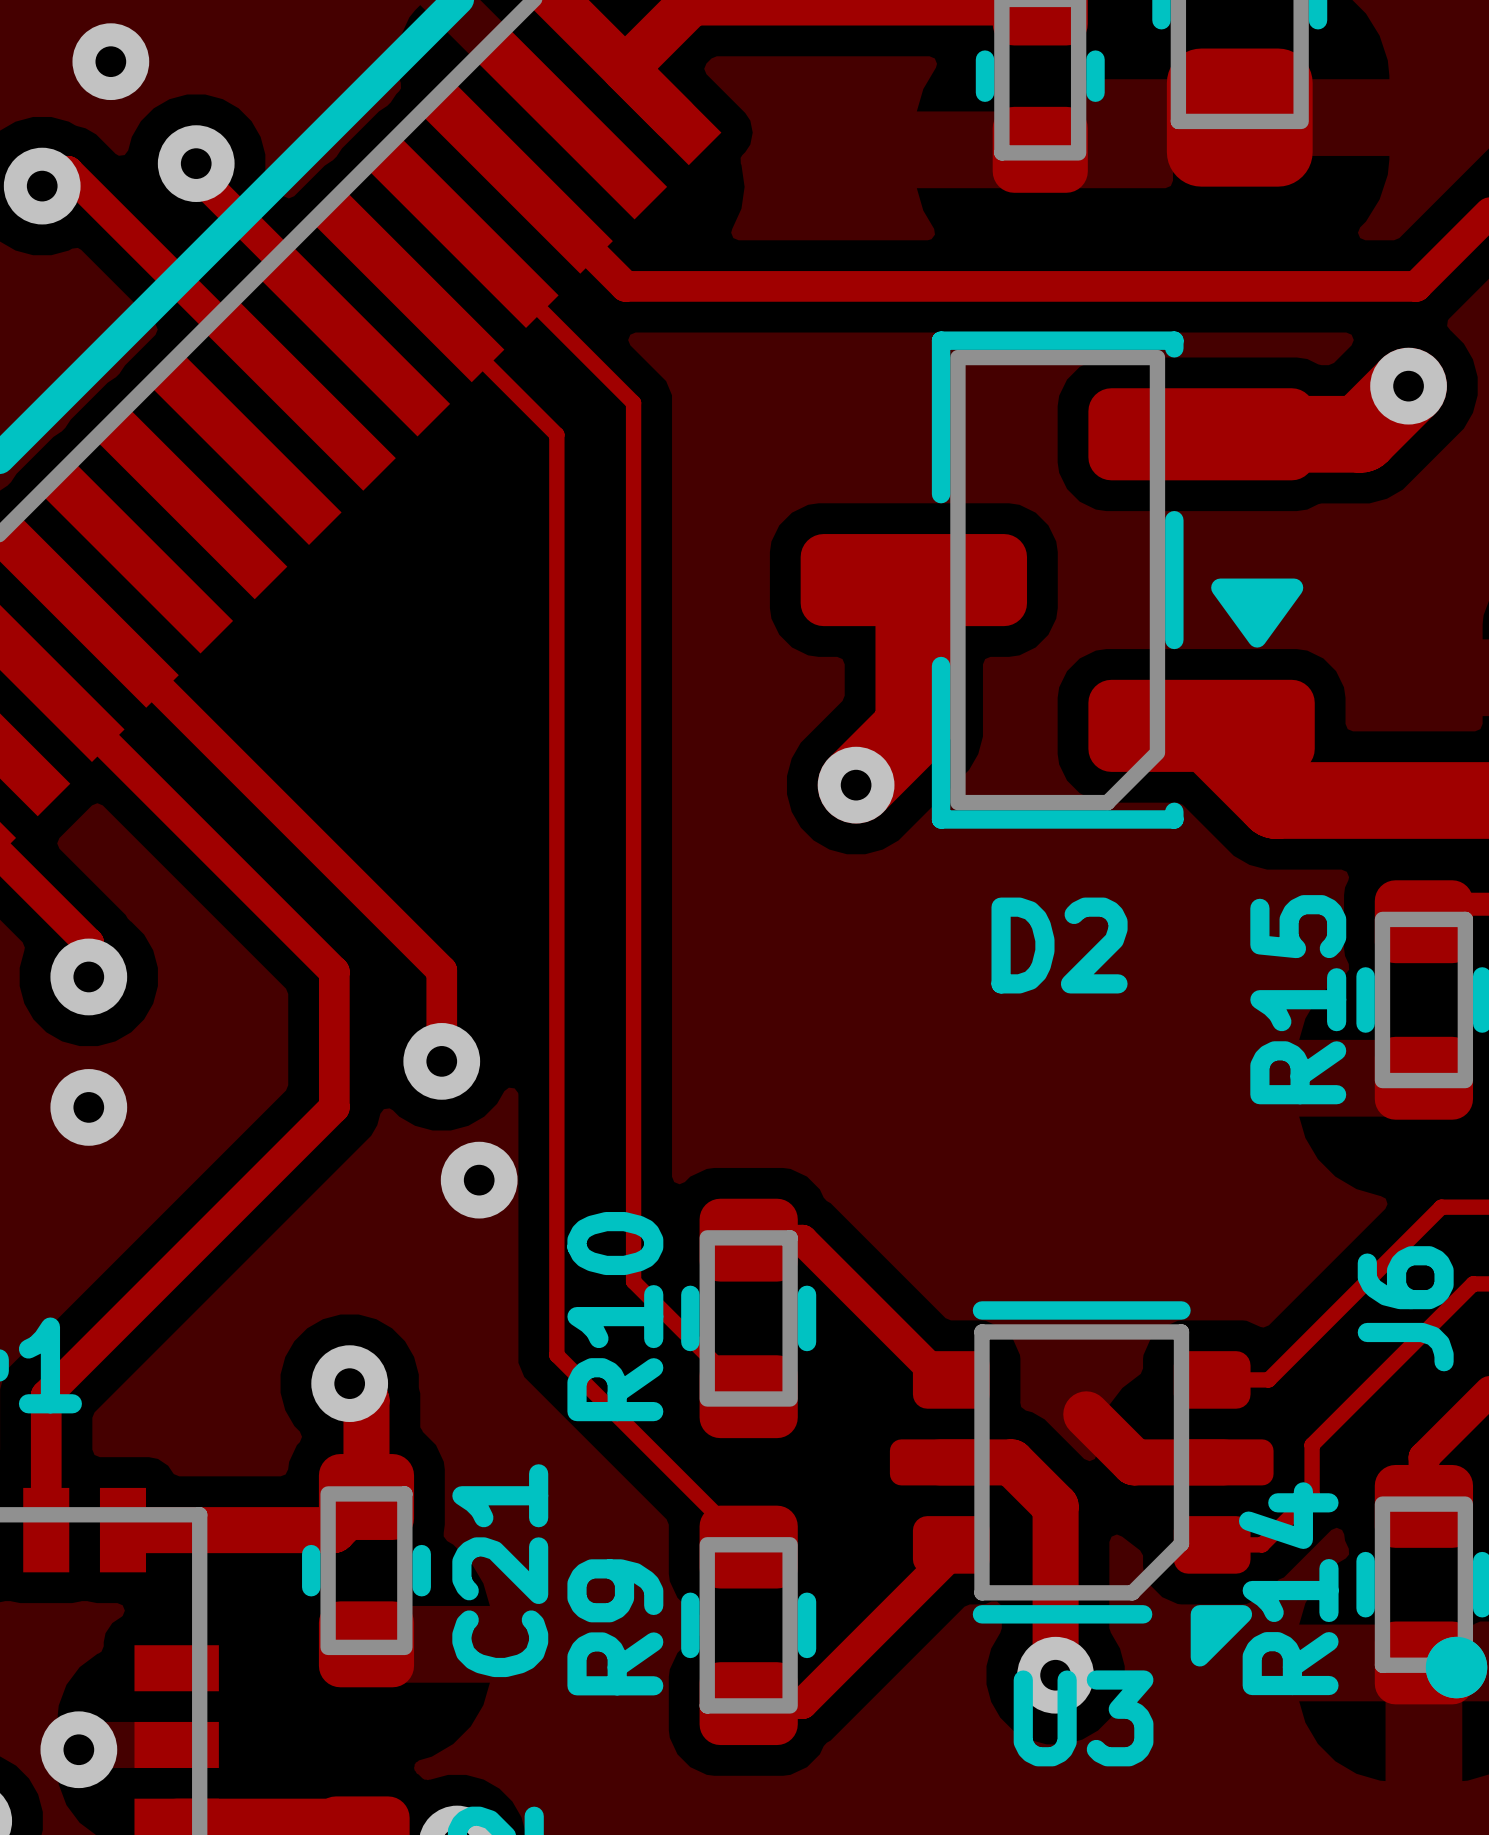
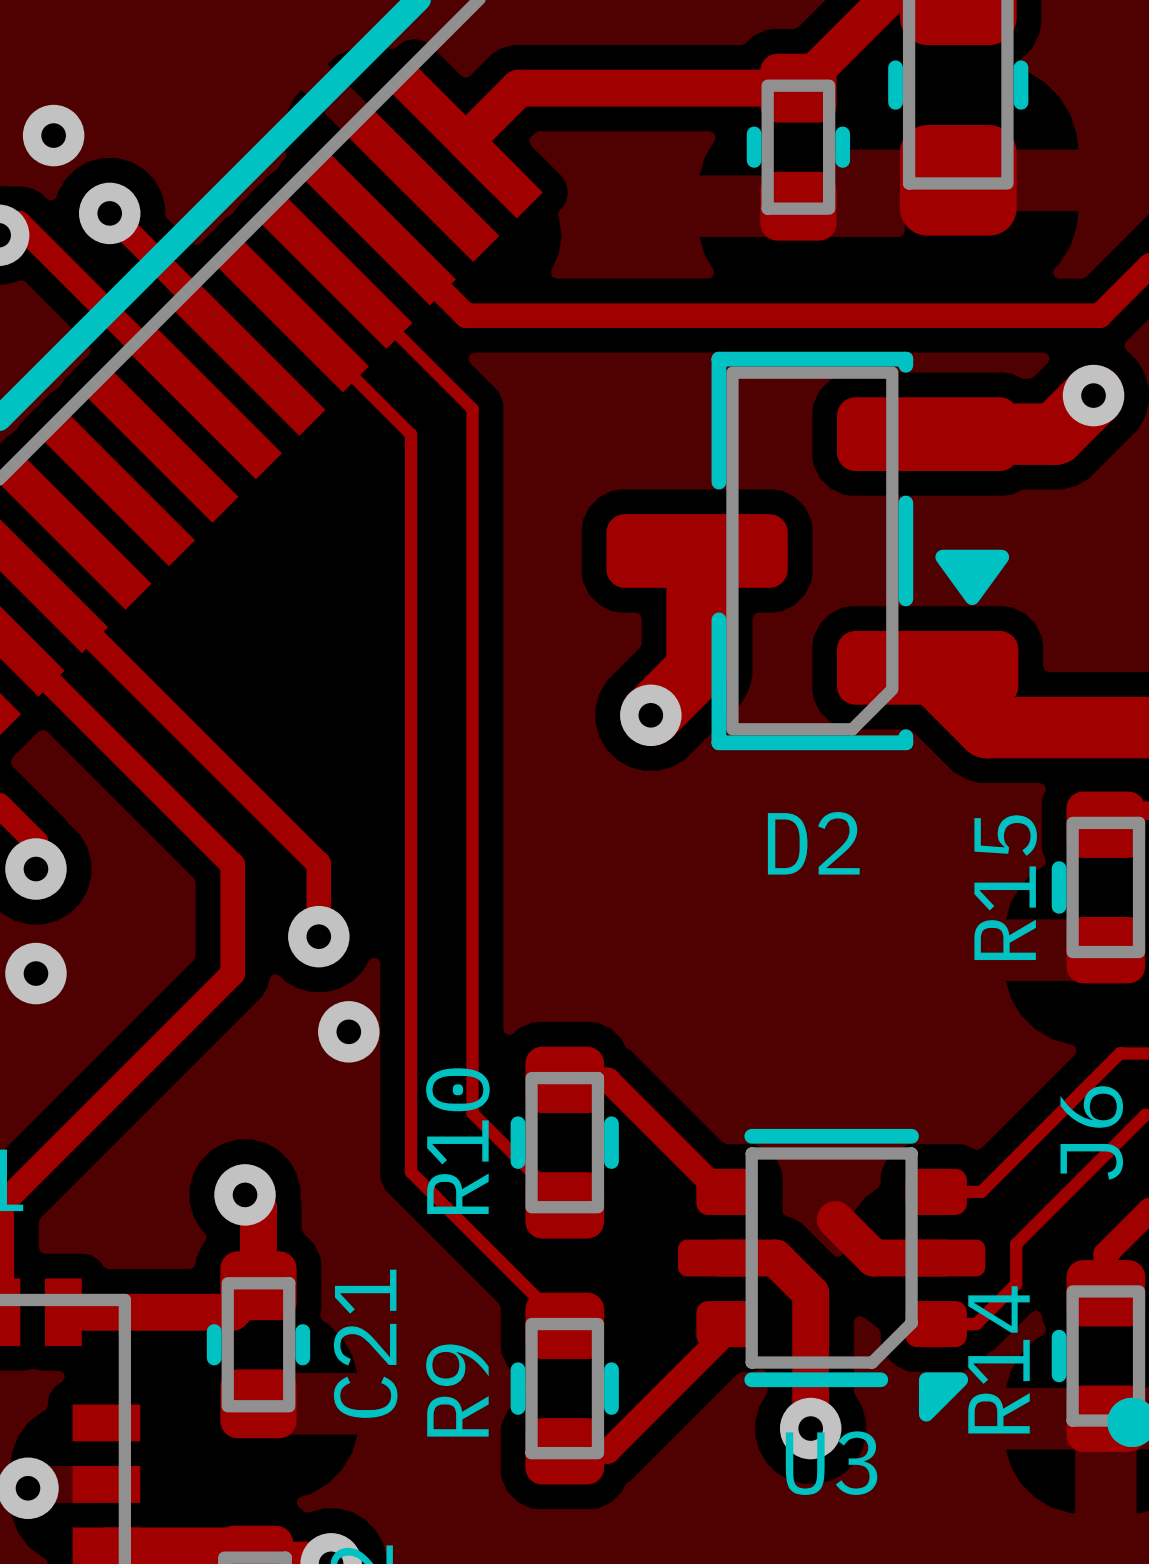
via position: (196, 163) -> (109, 213)

